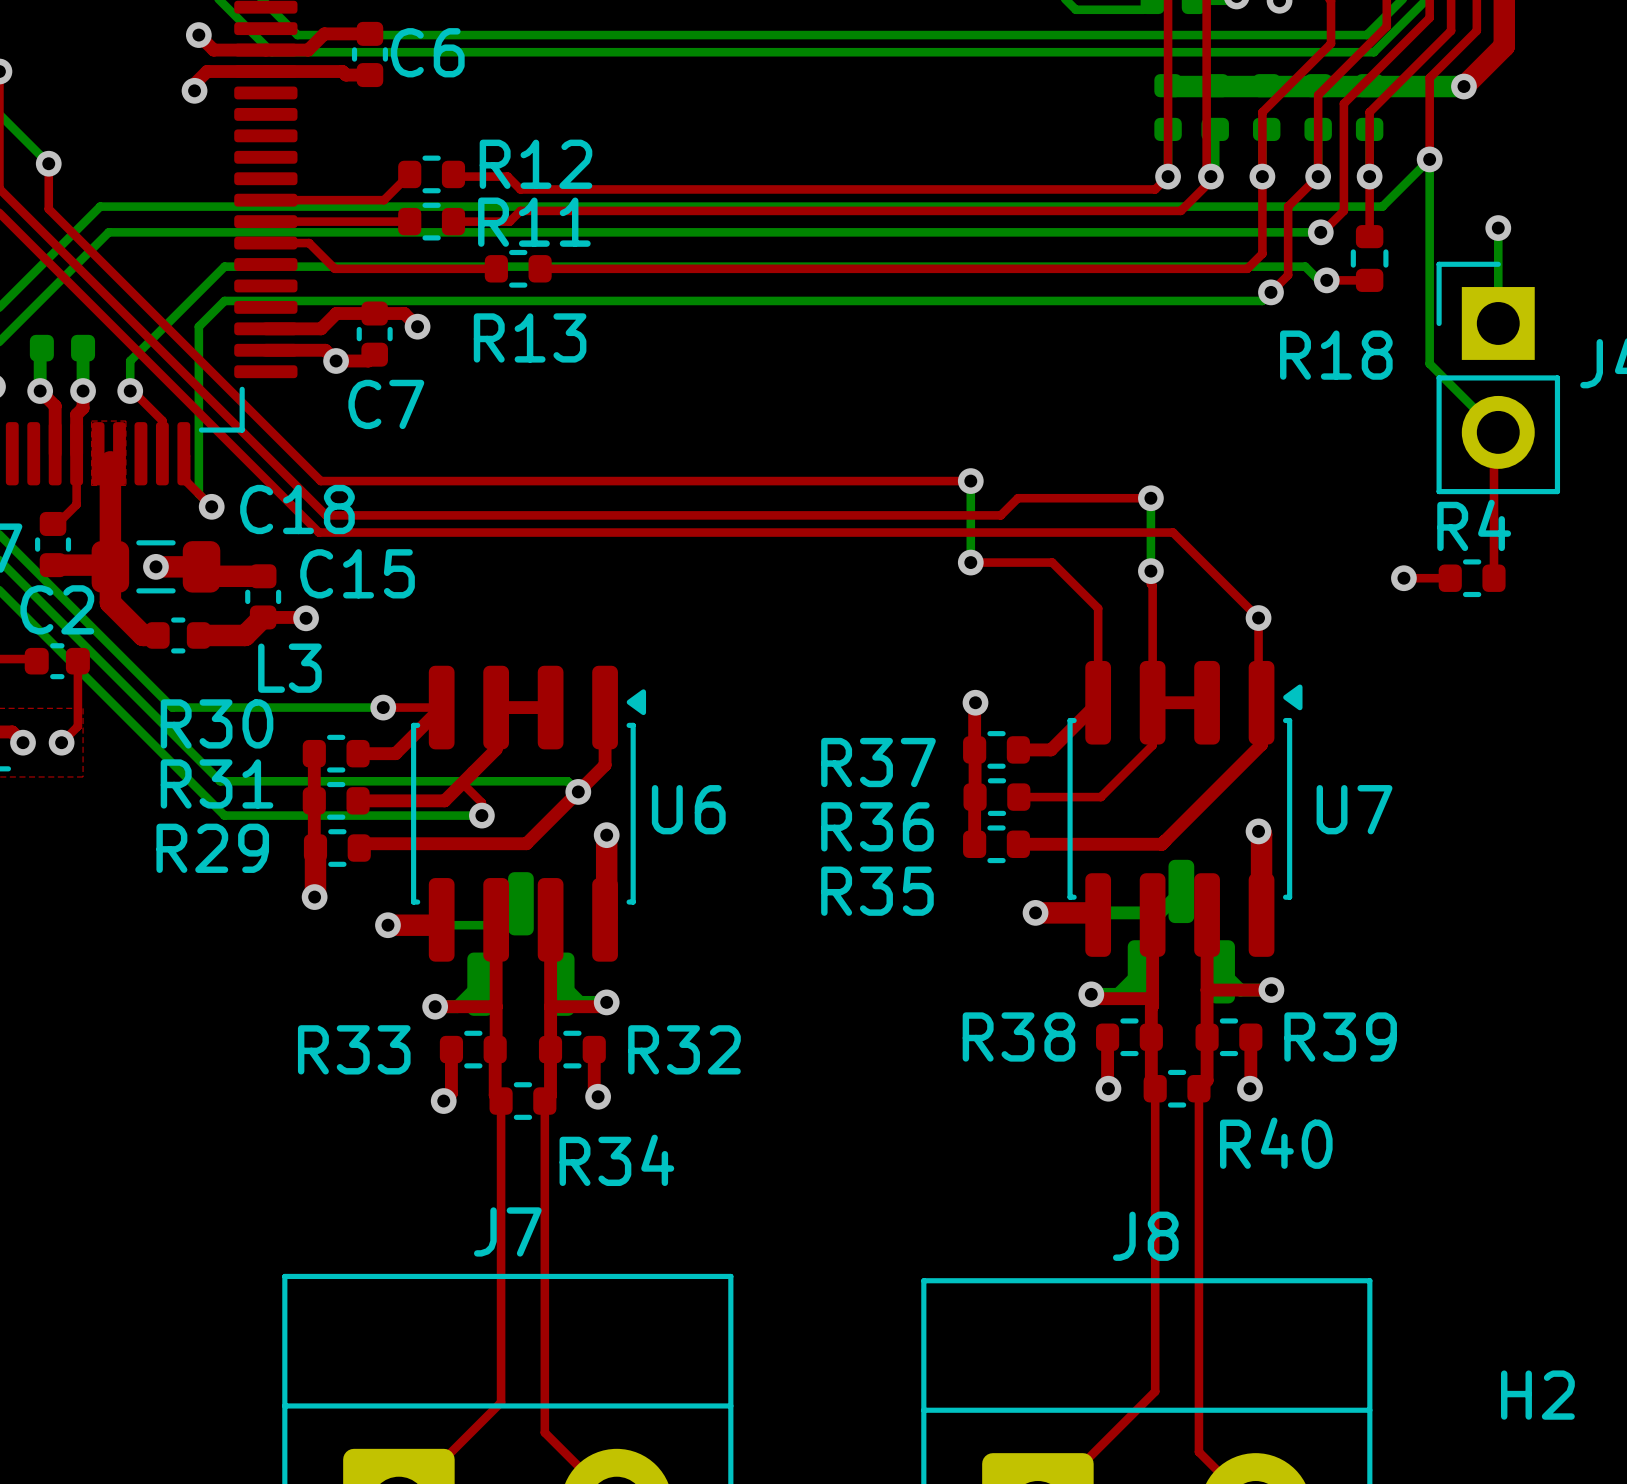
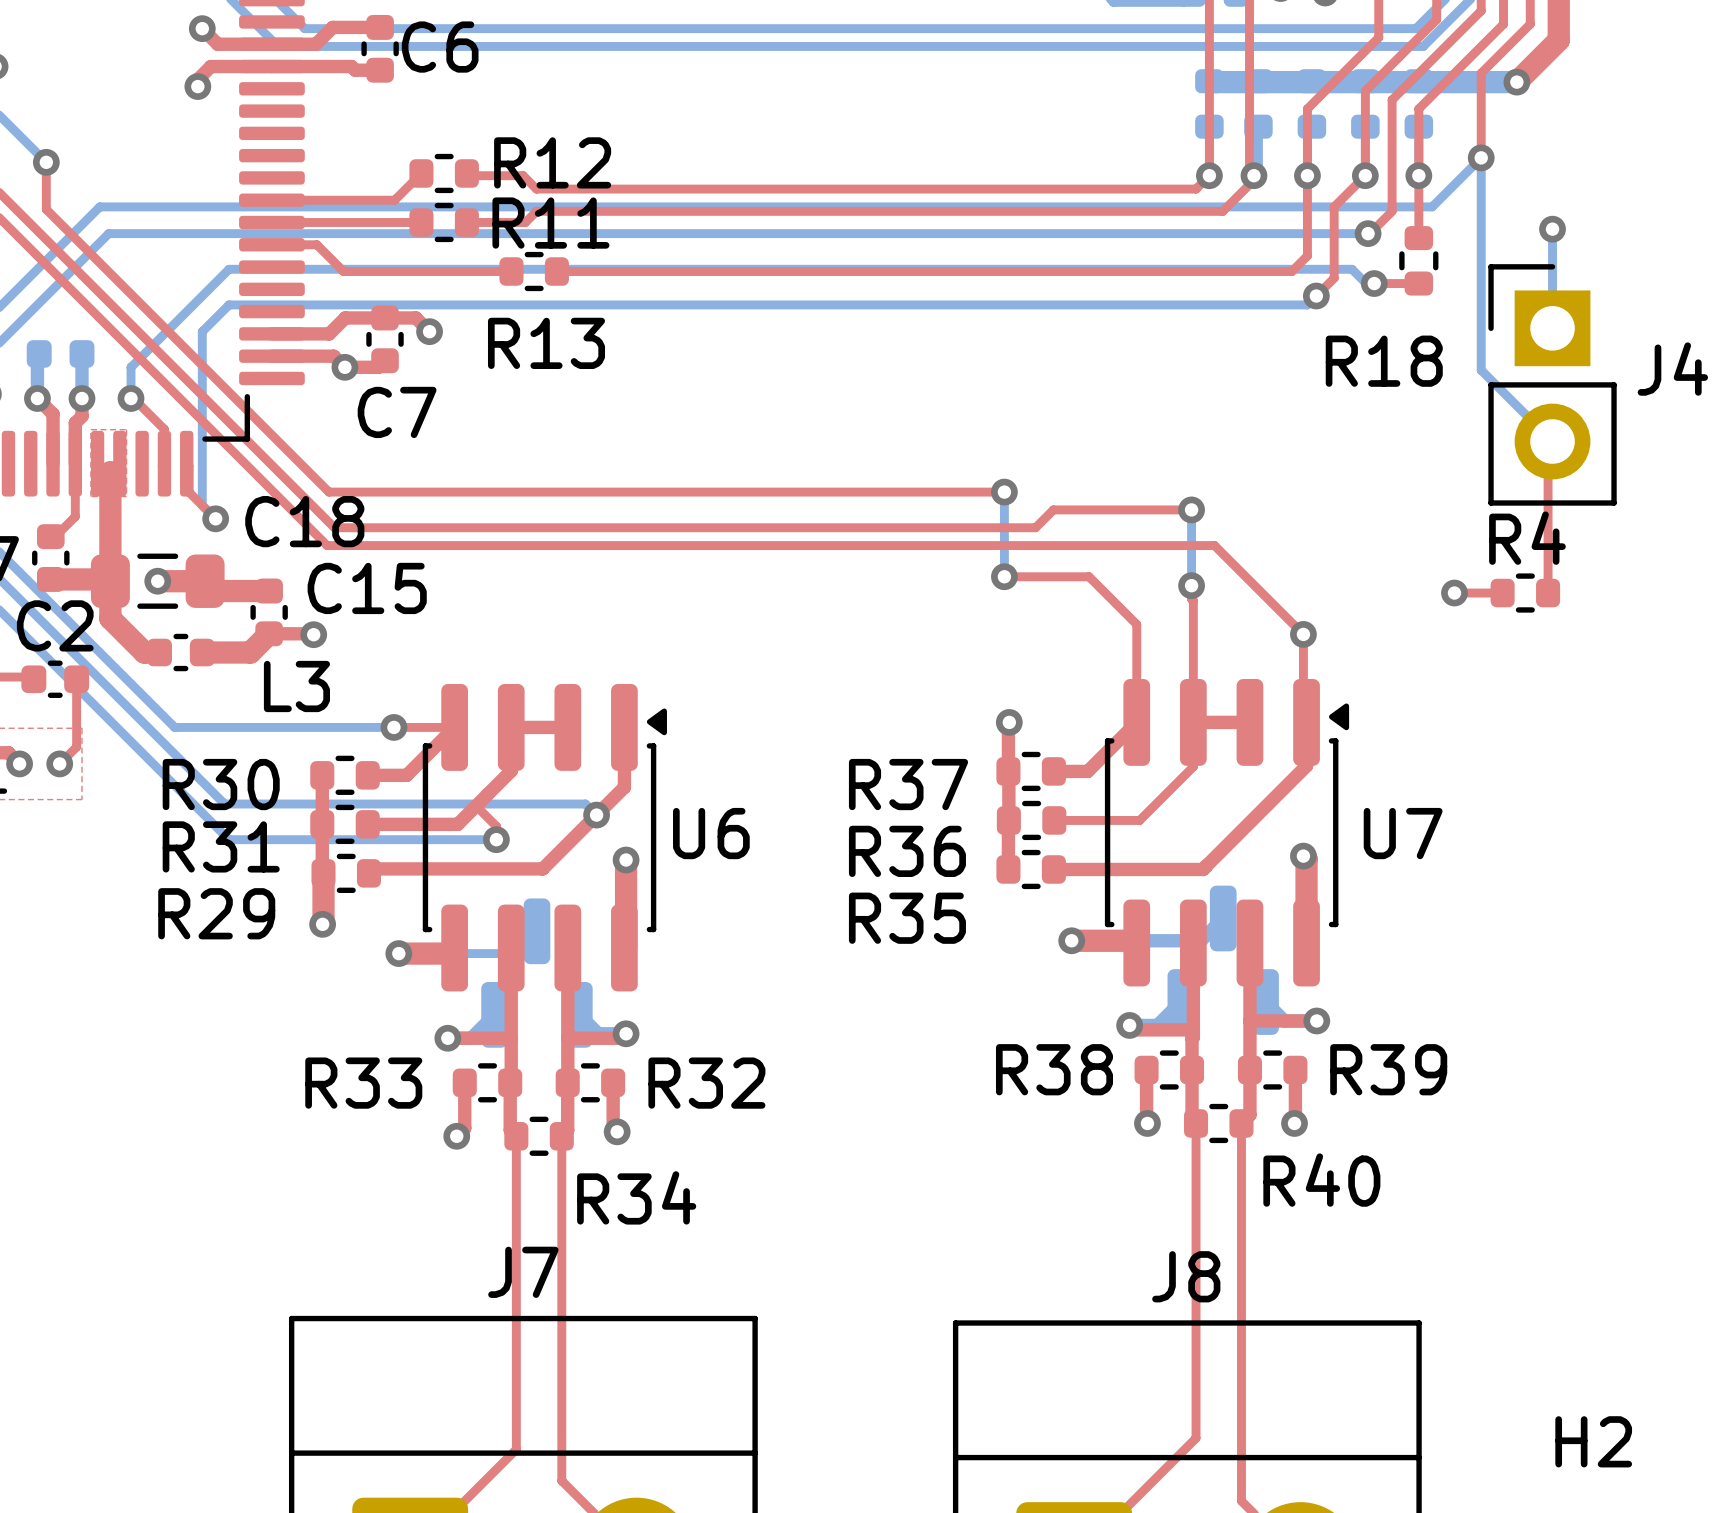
R30 name position: R30 (217, 723) -> R30 (221, 784)
R31 name position: R31 (217, 783) -> R31 (221, 846)
R29 name position: R29 (212, 848) -> R29 (216, 913)

